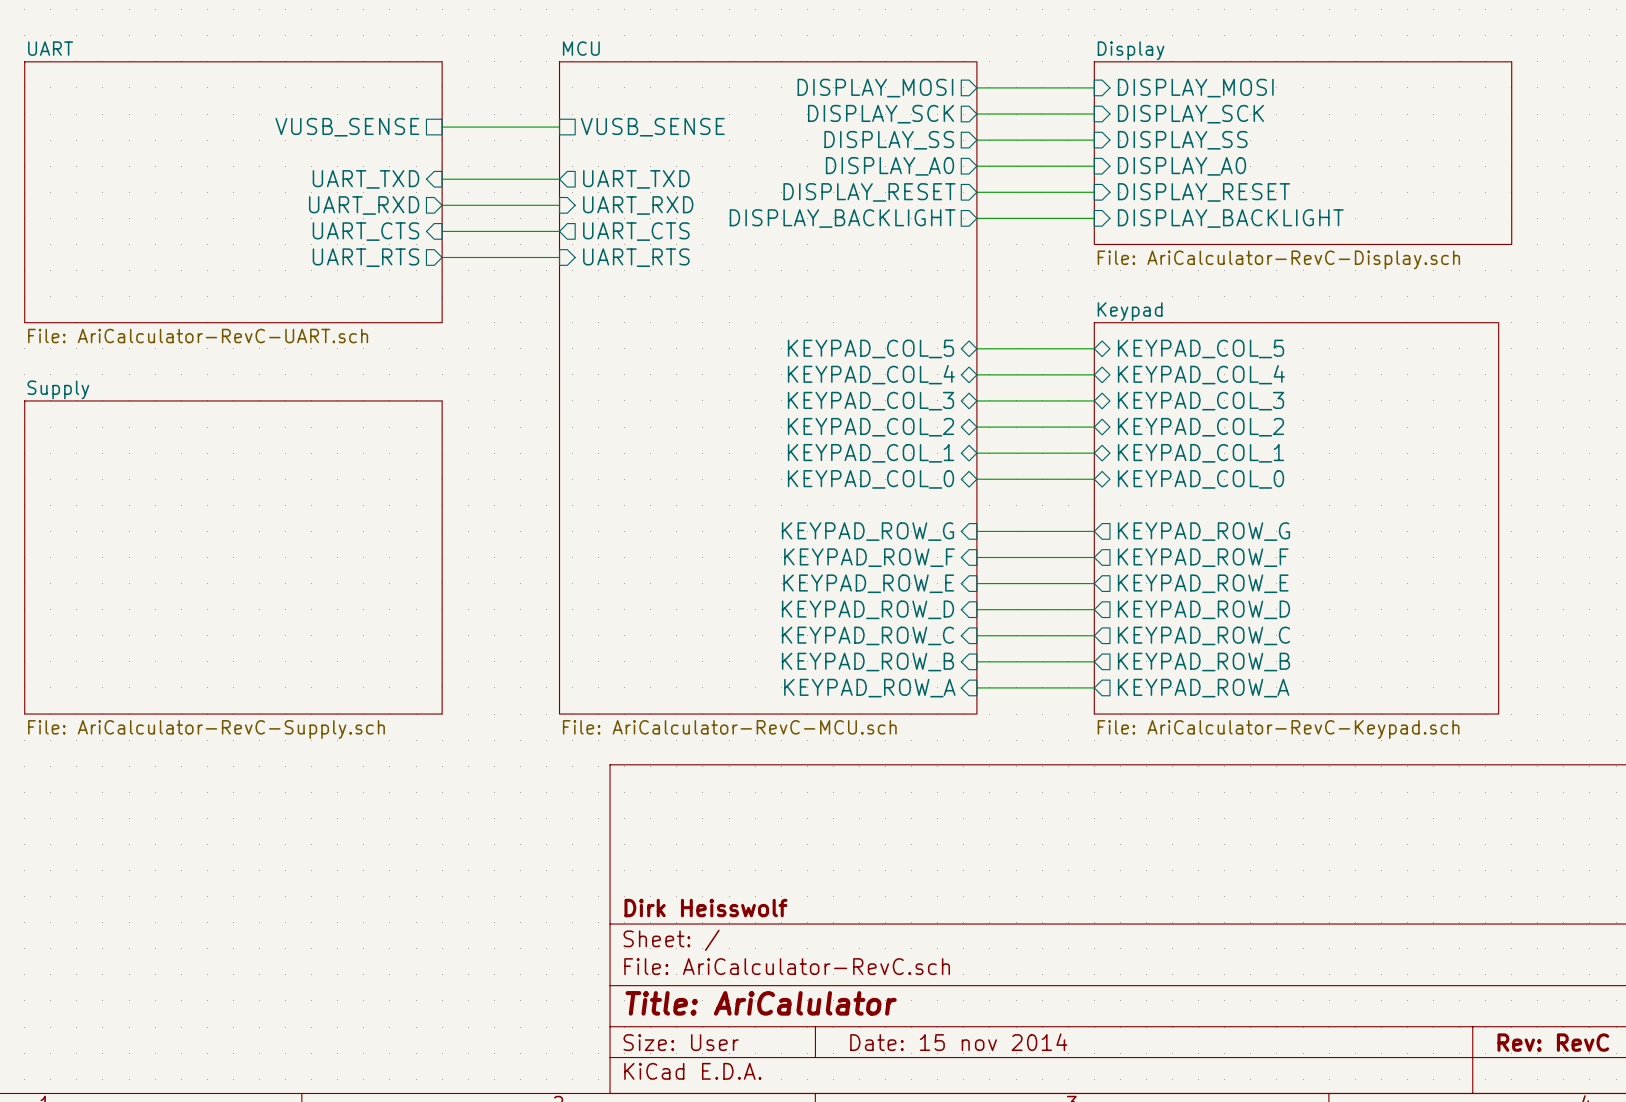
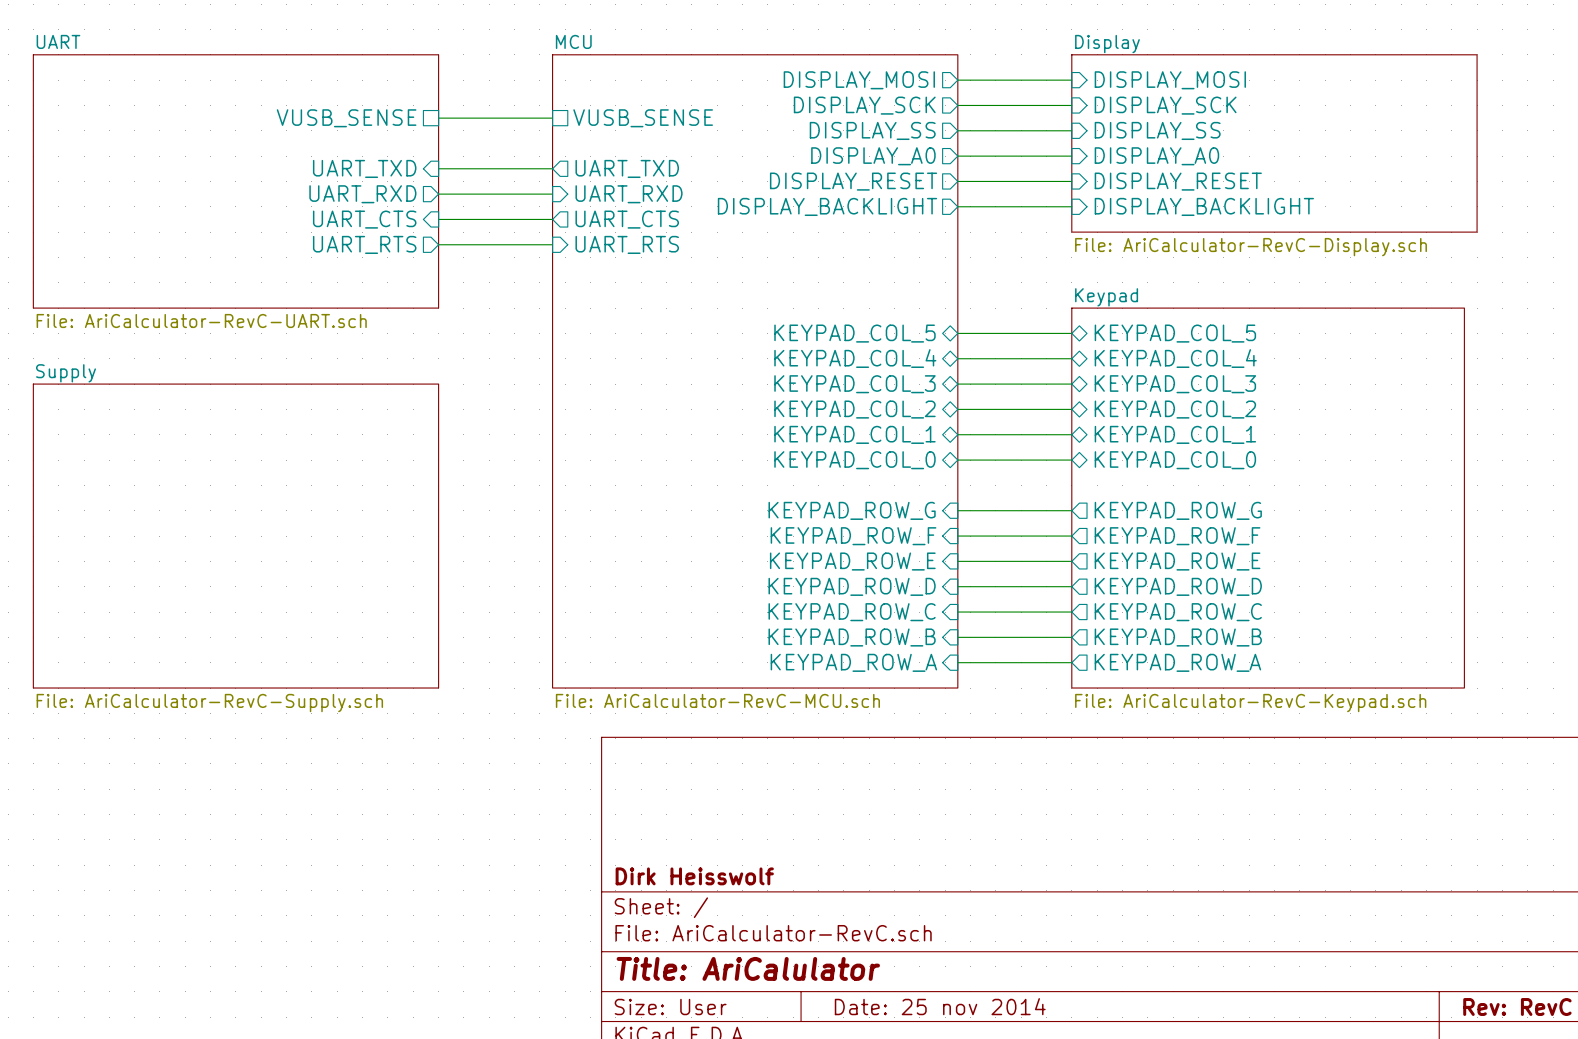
title block: Date: 15 nov 2014 (958, 1042) -> Date: 25 nov 2014 (940, 1006)

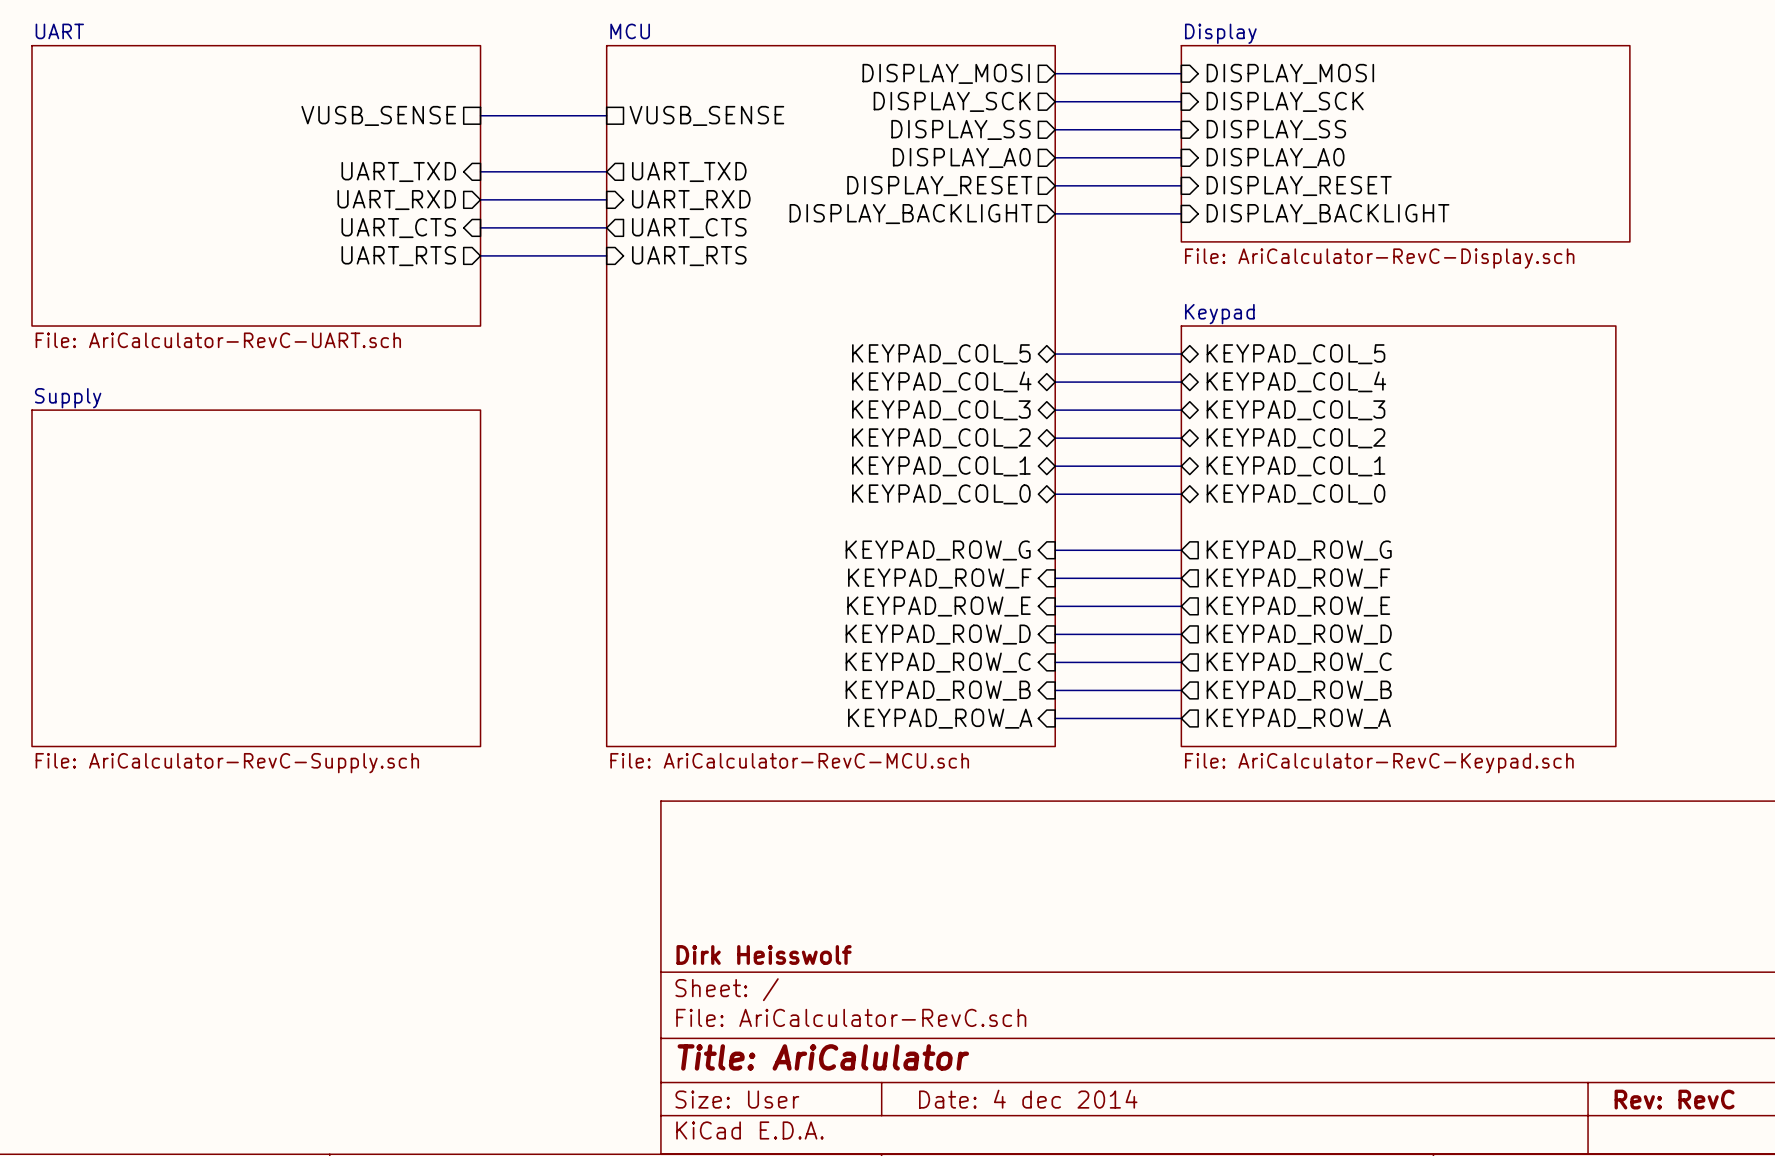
title block: Date: 25 nov 2014 (940, 1006) -> Date: 4 dec 2014 (1028, 1099)

